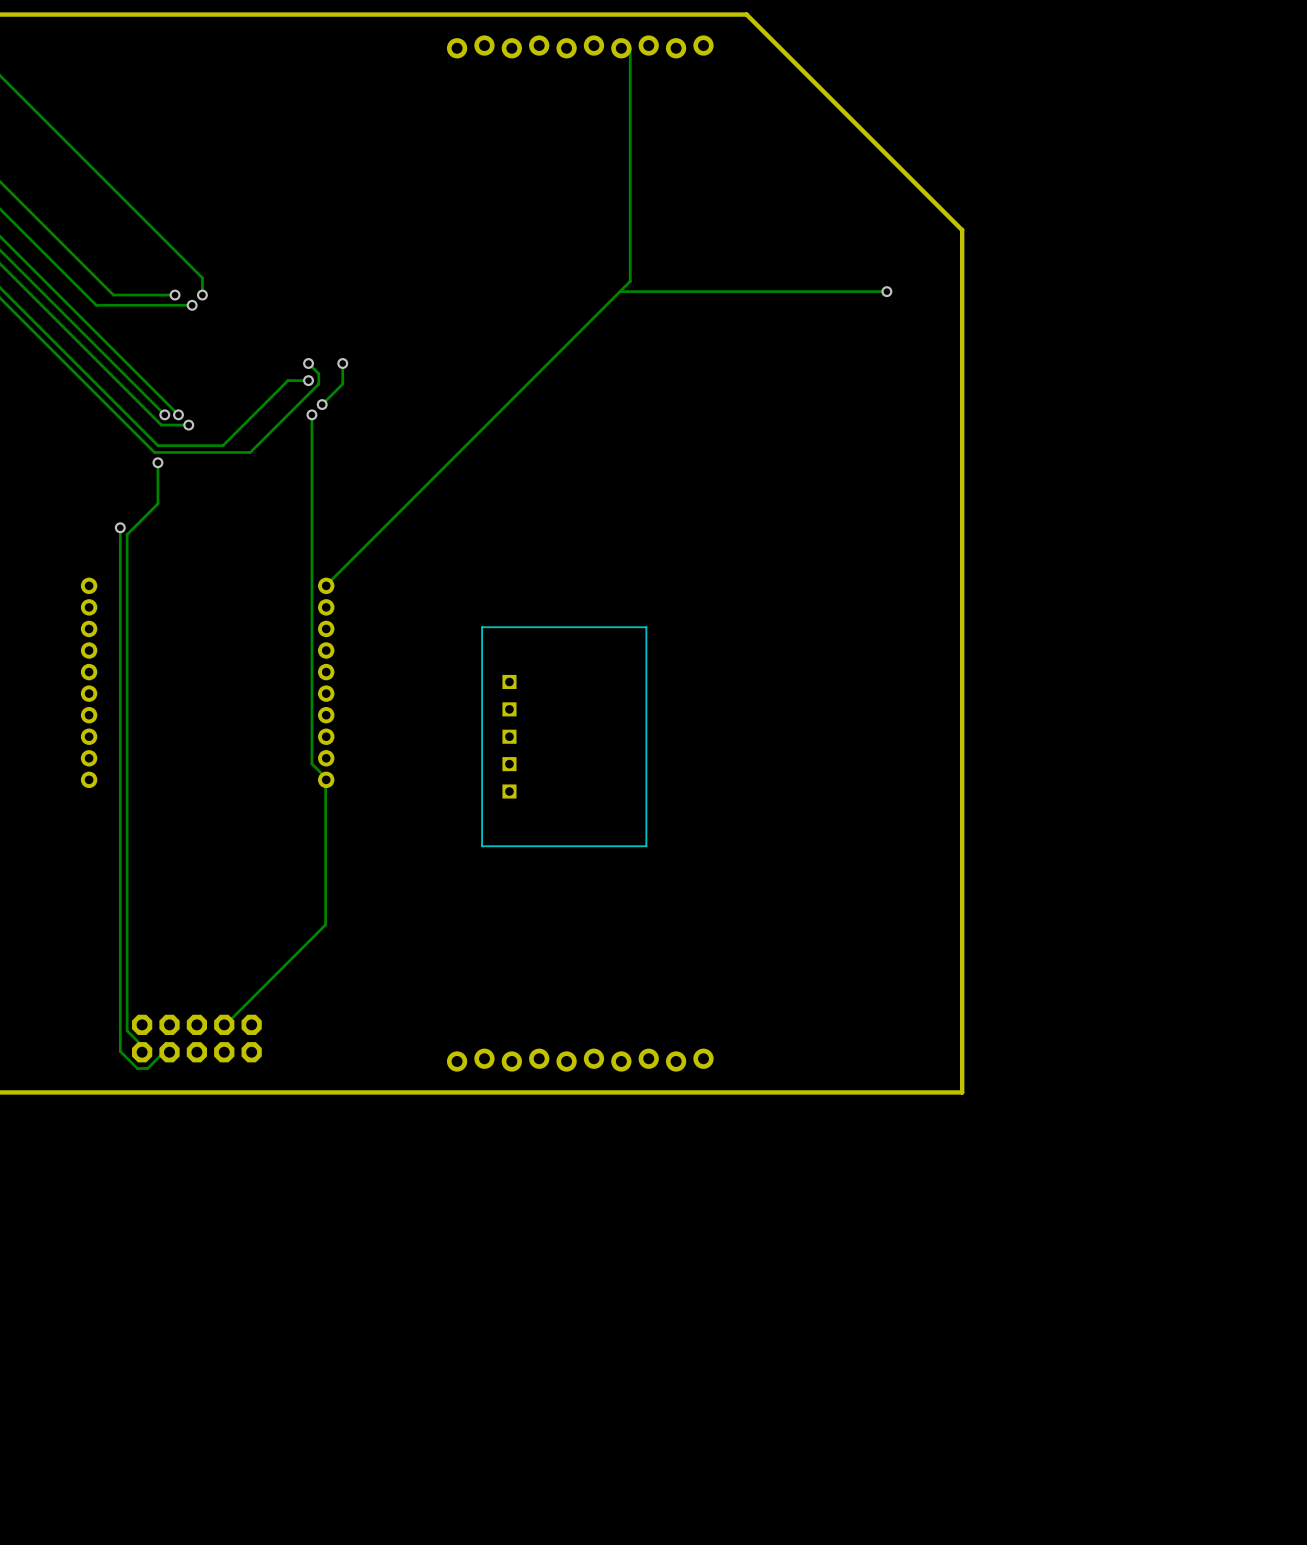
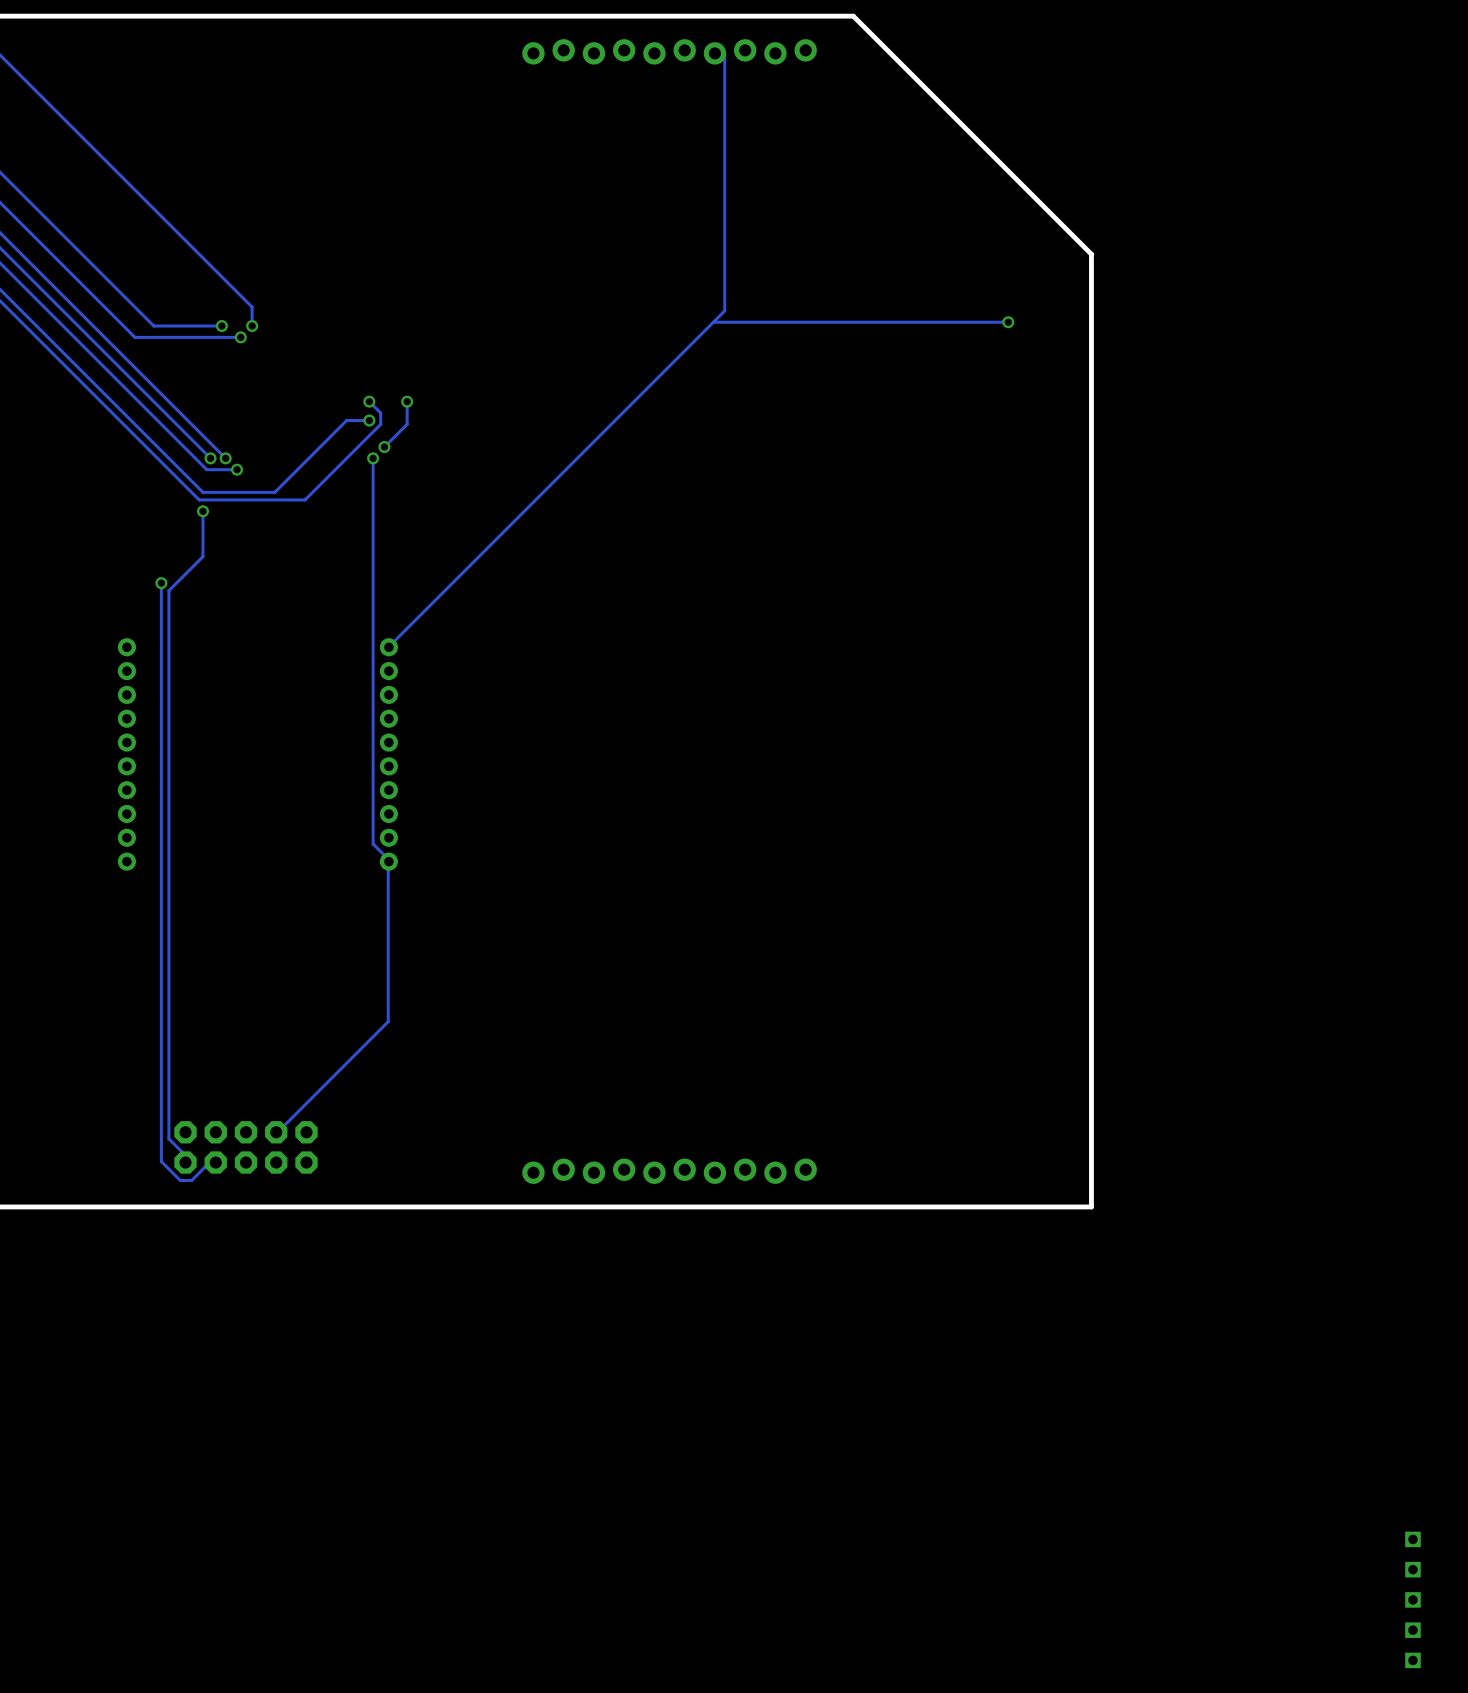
part: (564, 736) -> none
part: none -> (1412, 1599)

